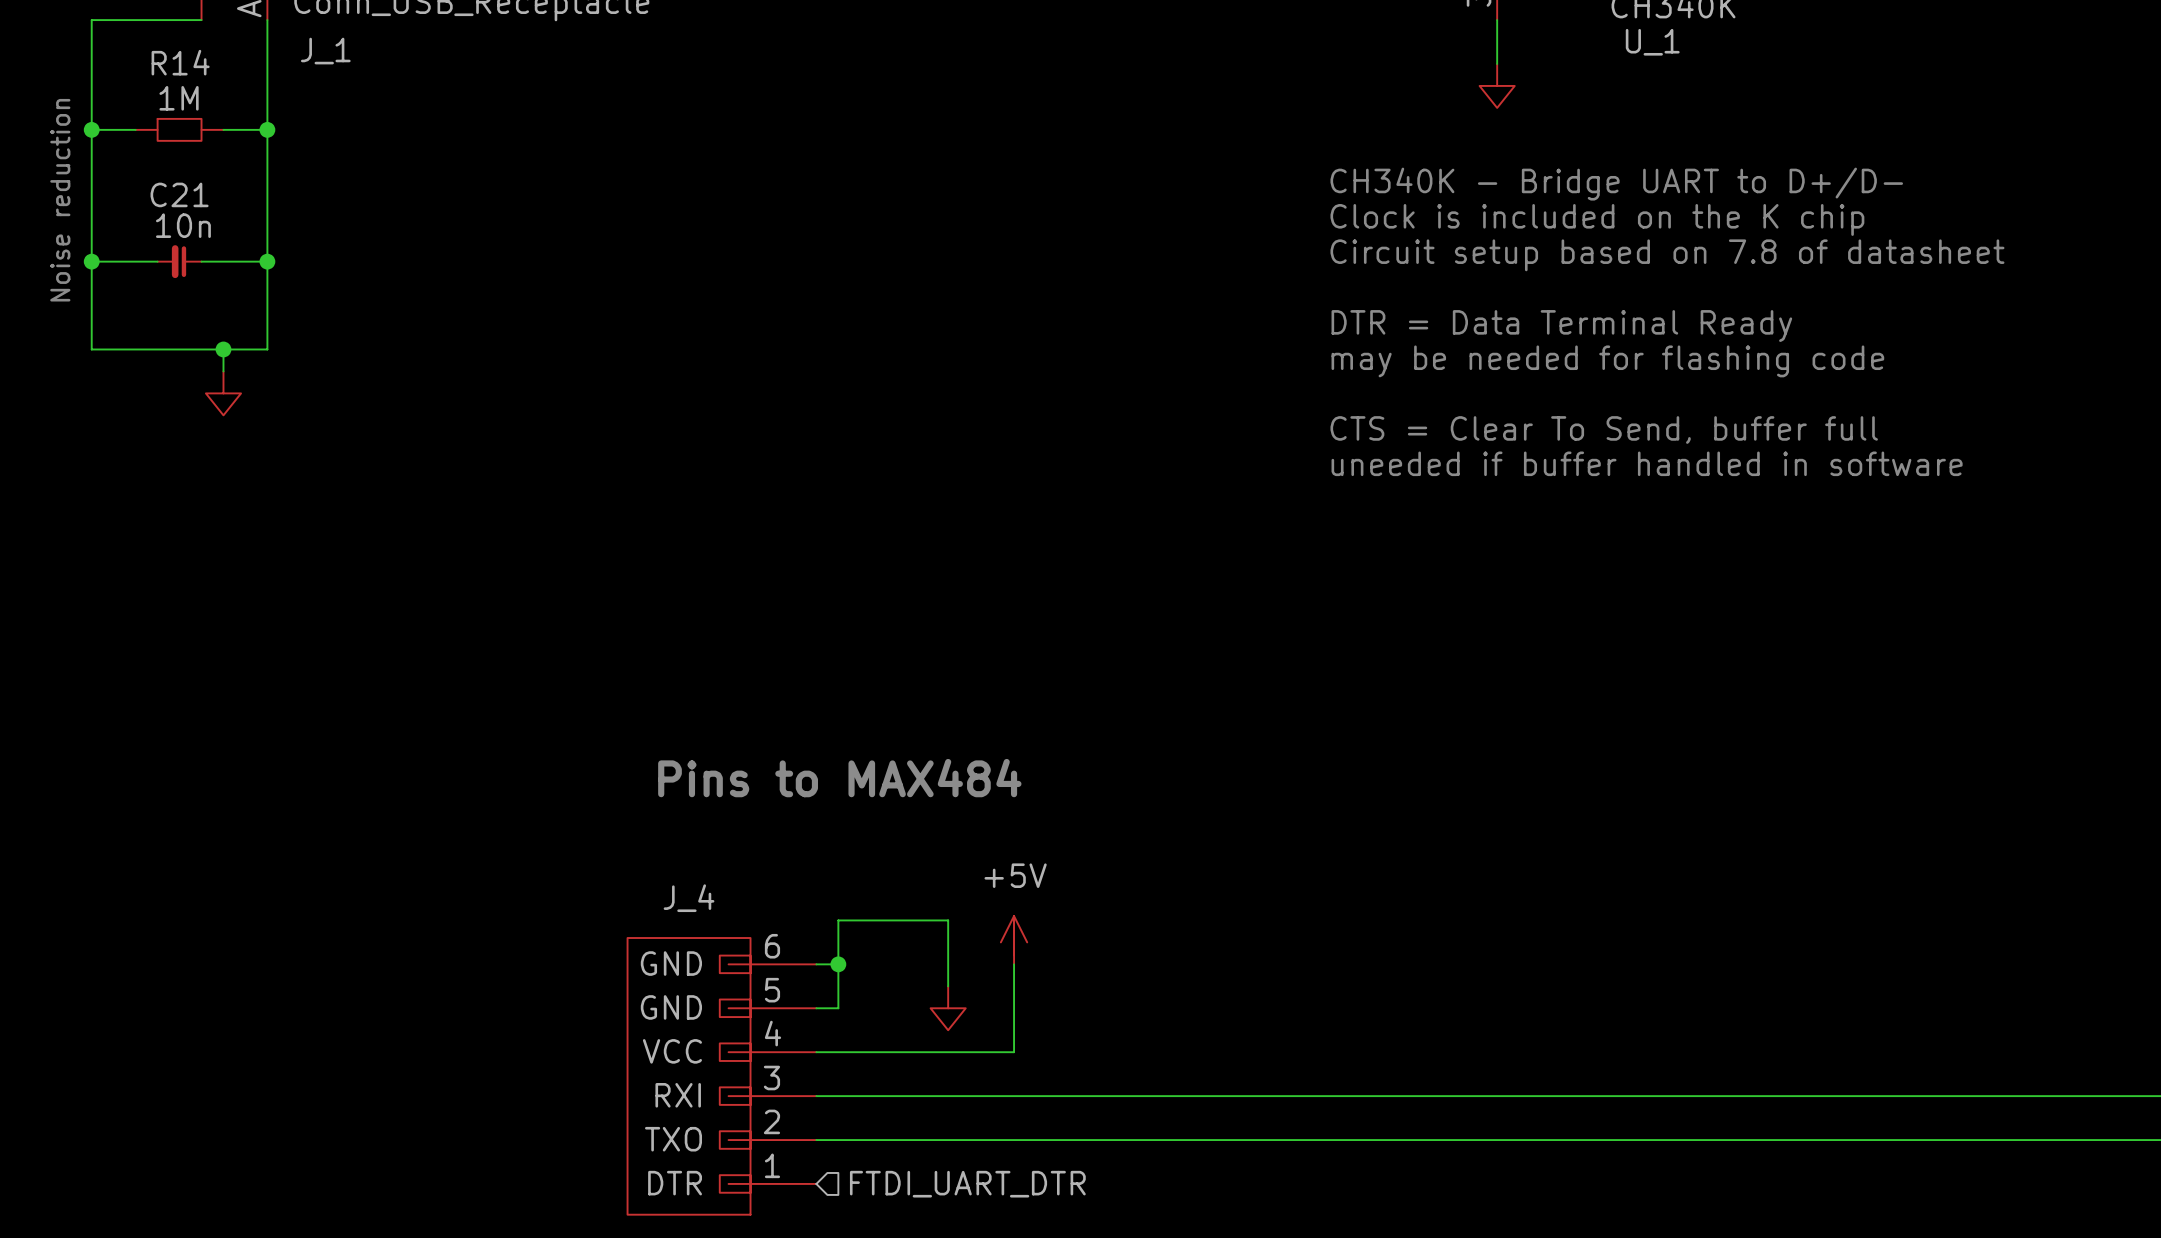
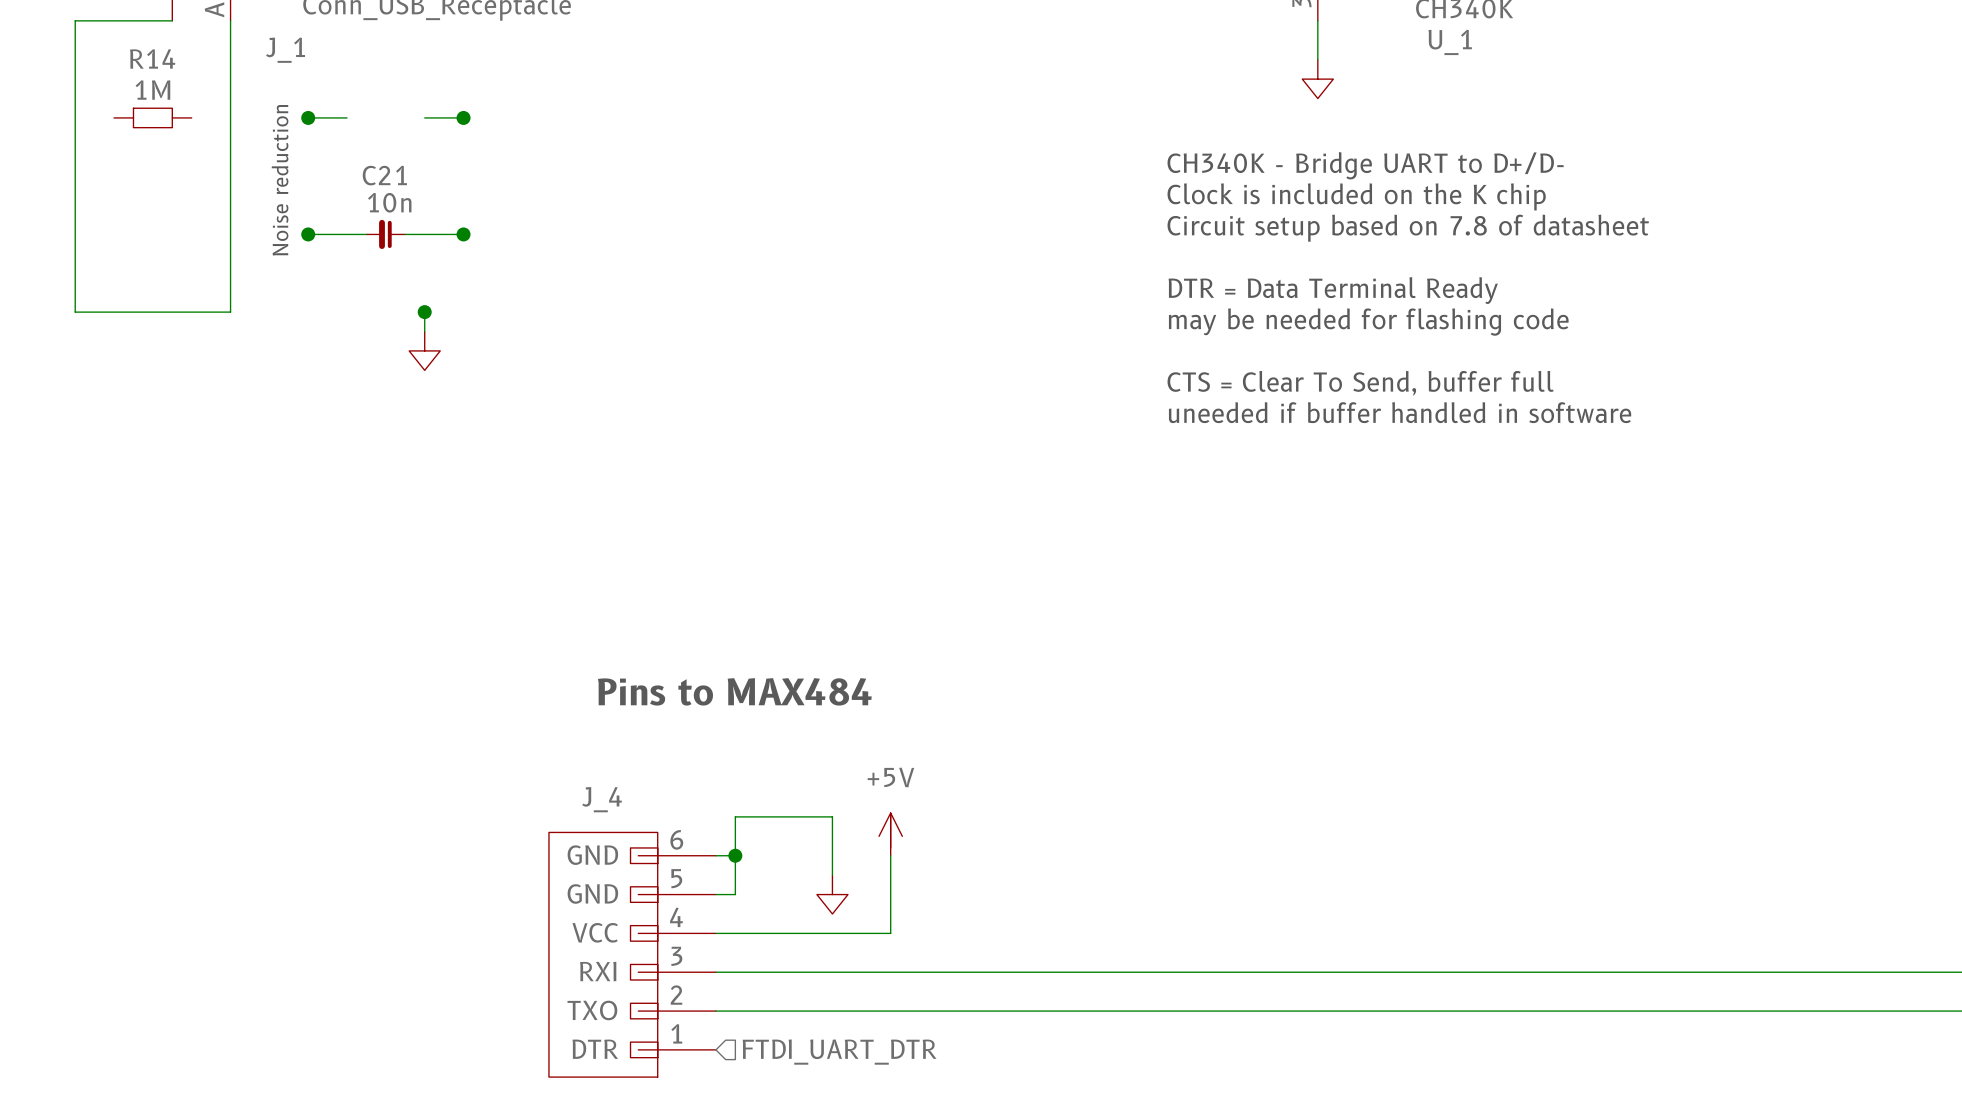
wire: (91, 129) (135, 129) -> (308, 117) (347, 117)
junction: (91, 129) -> none
wire: (223, 129) (267, 129) -> (424, 117) (463, 117)
junction: (267, 129) -> none
junction: none -> (308, 117)
junction: none -> (463, 117)
text position: Noise reduction (60, 200) -> Noise reduction (280, 180)
wire: (91, 261) (157, 261) -> (308, 234) (366, 234)
junction: (91, 261) -> none
C21 position: (179, 261) -> (385, 234)
wire: (201, 261) (267, 261) -> (405, 234) (463, 234)
junction: (267, 261) -> none
junction: none -> (308, 234)
junction: none -> (463, 234)
wire: (223, 349) (223, 371) -> (424, 312) (424, 331)
junction: (223, 349) -> none
junction: none -> (424, 312)
power symbol position: (223, 393) -> (424, 350)

